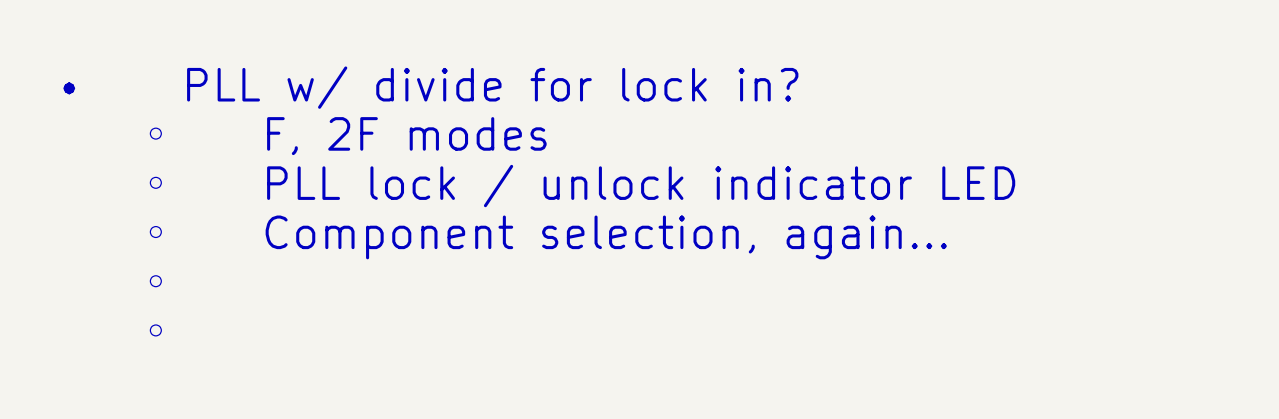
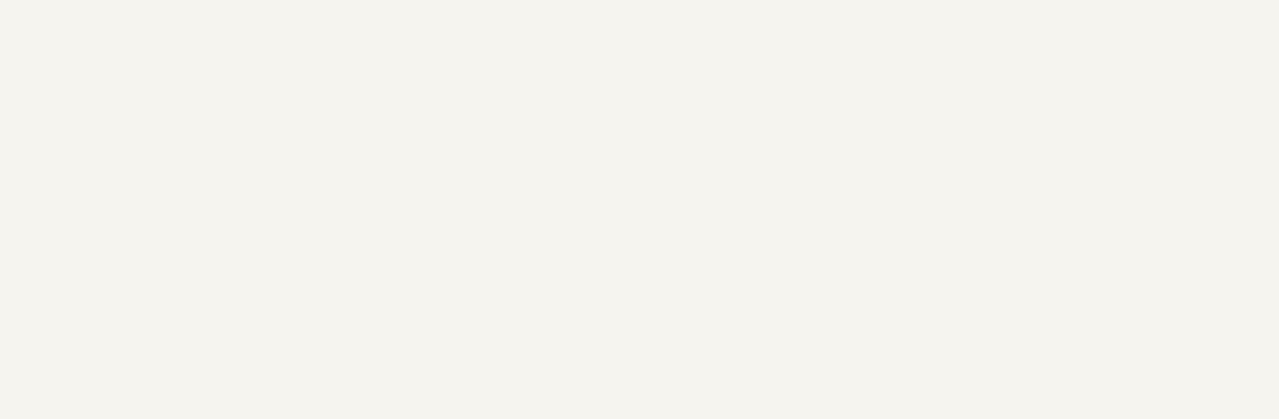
text: • PLL w/ divide for lock in? (430, 87) -> none
text: ◦ F, 2F modes (347, 136) -> none
text: ◦ PLL lock / unlock indicator LED (581, 186) -> none
text: ◦ Component selection, again... (547, 237) -> none
text: ◦ (155, 281) -> none
text: ◦ (155, 330) -> none

